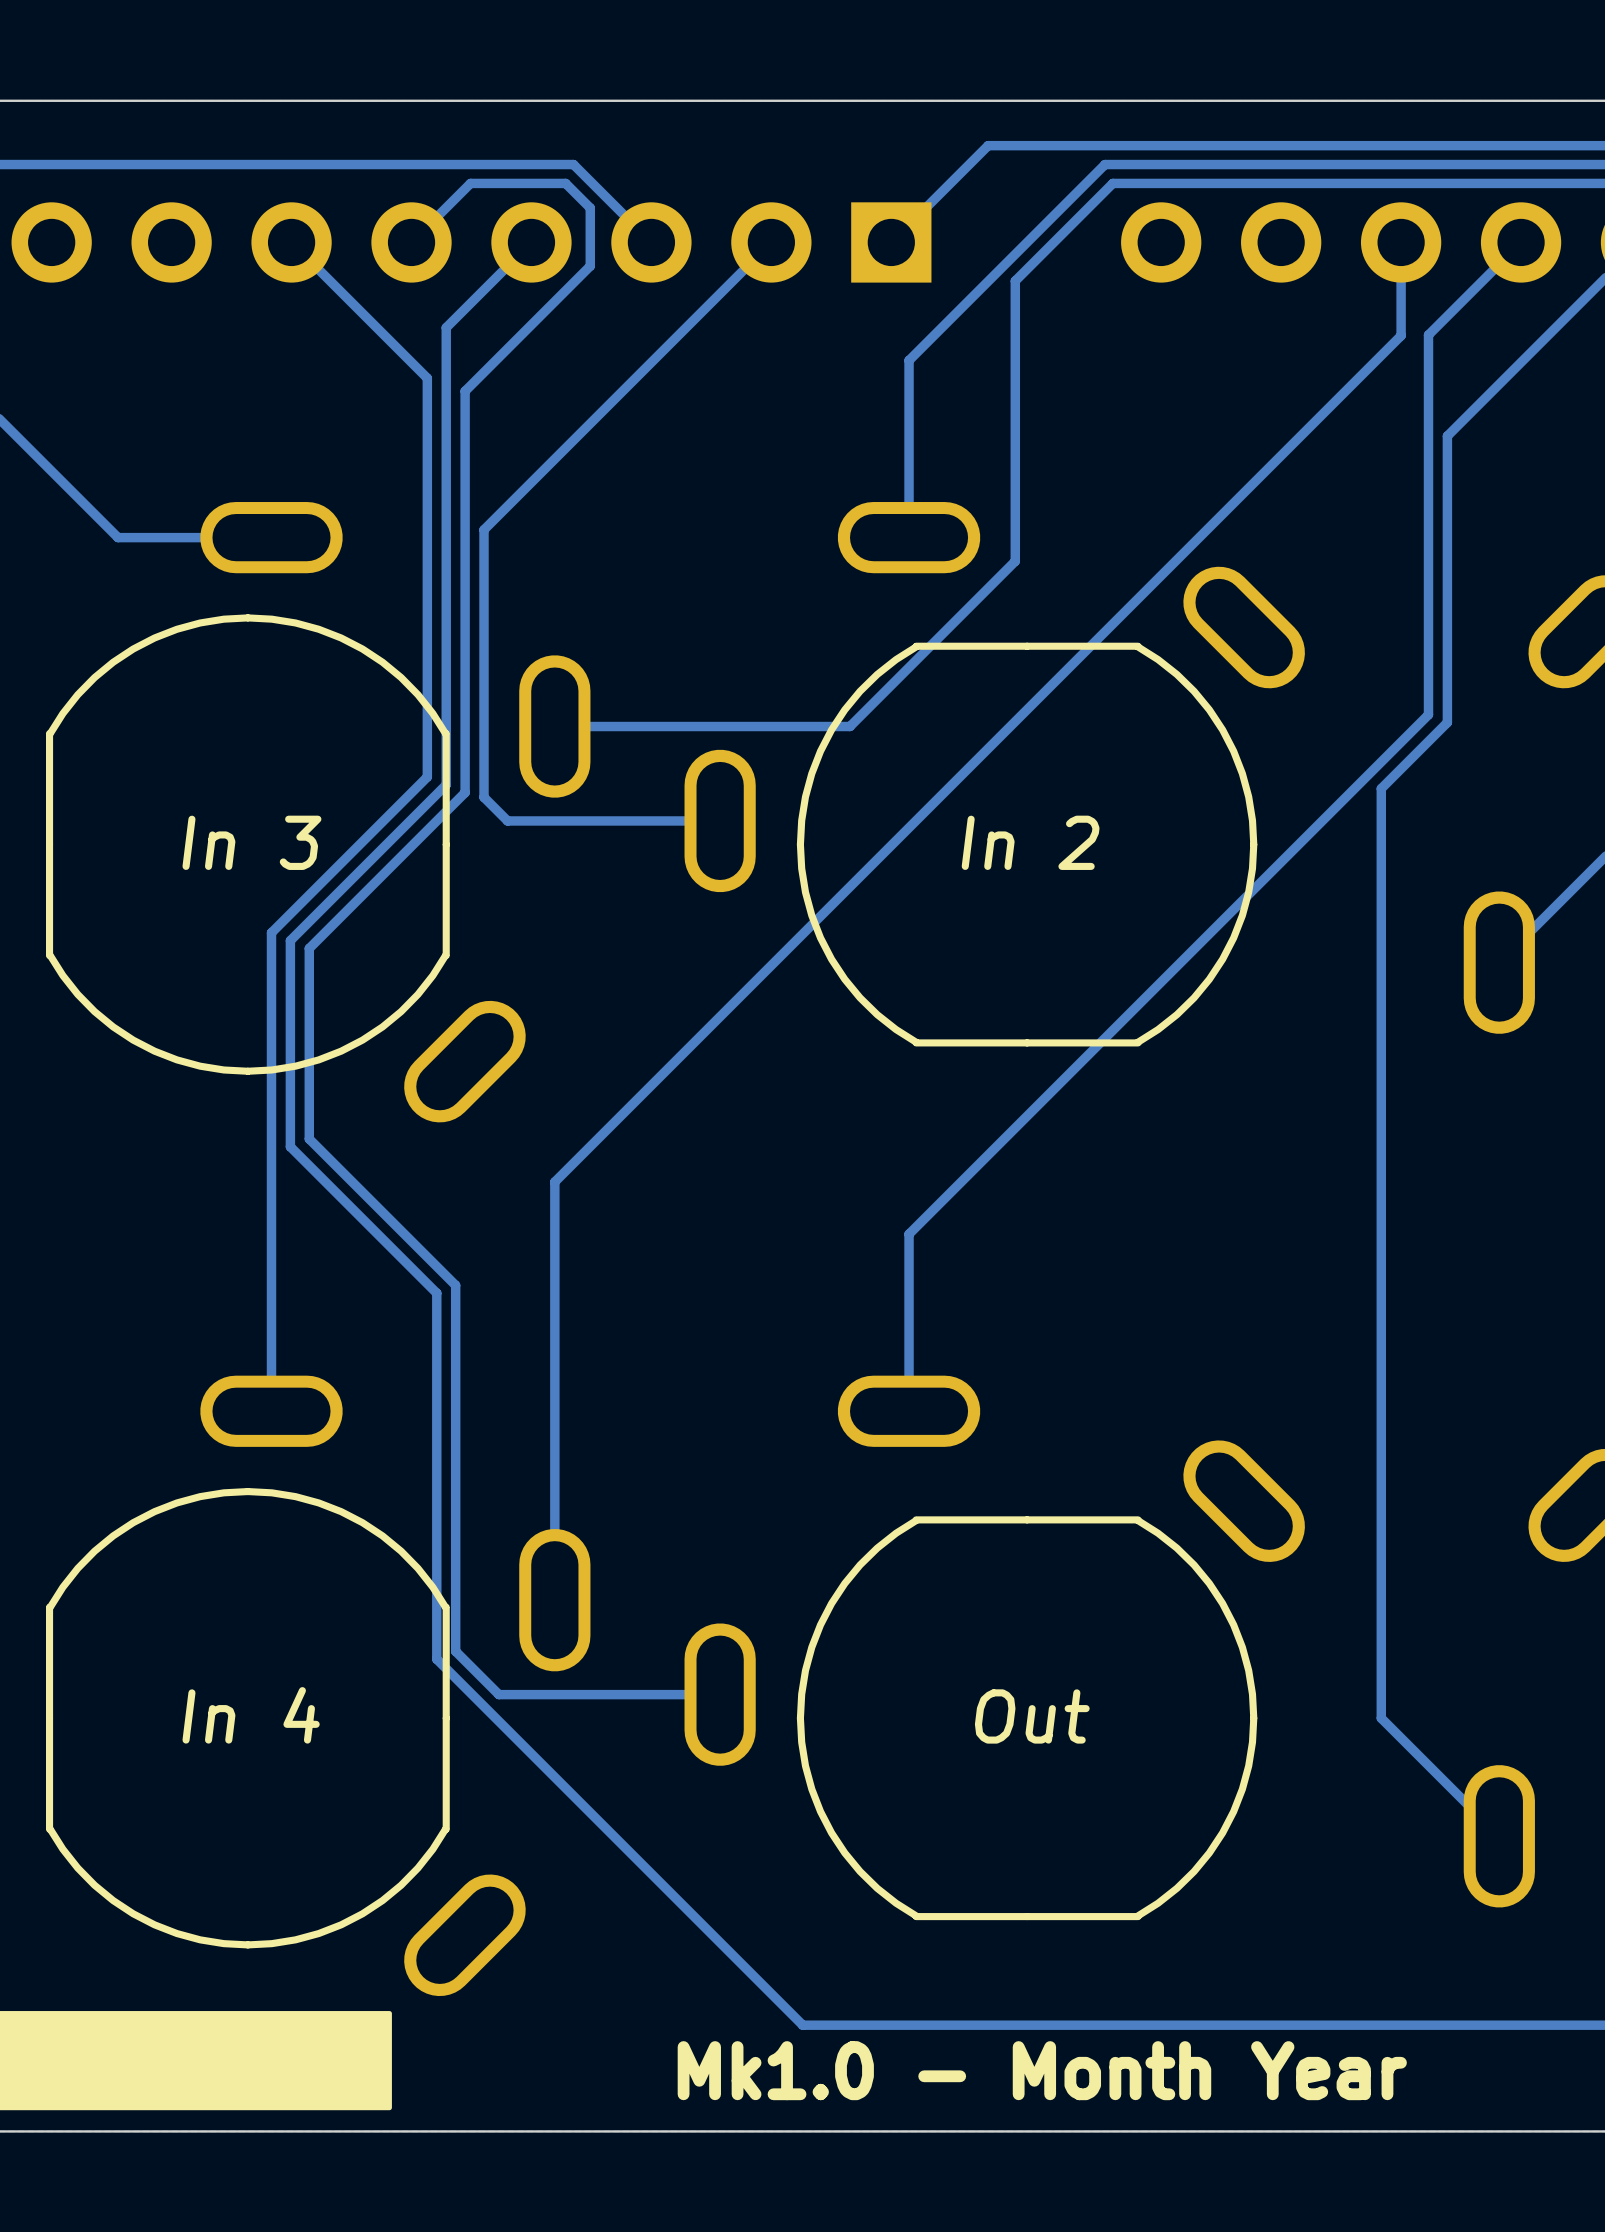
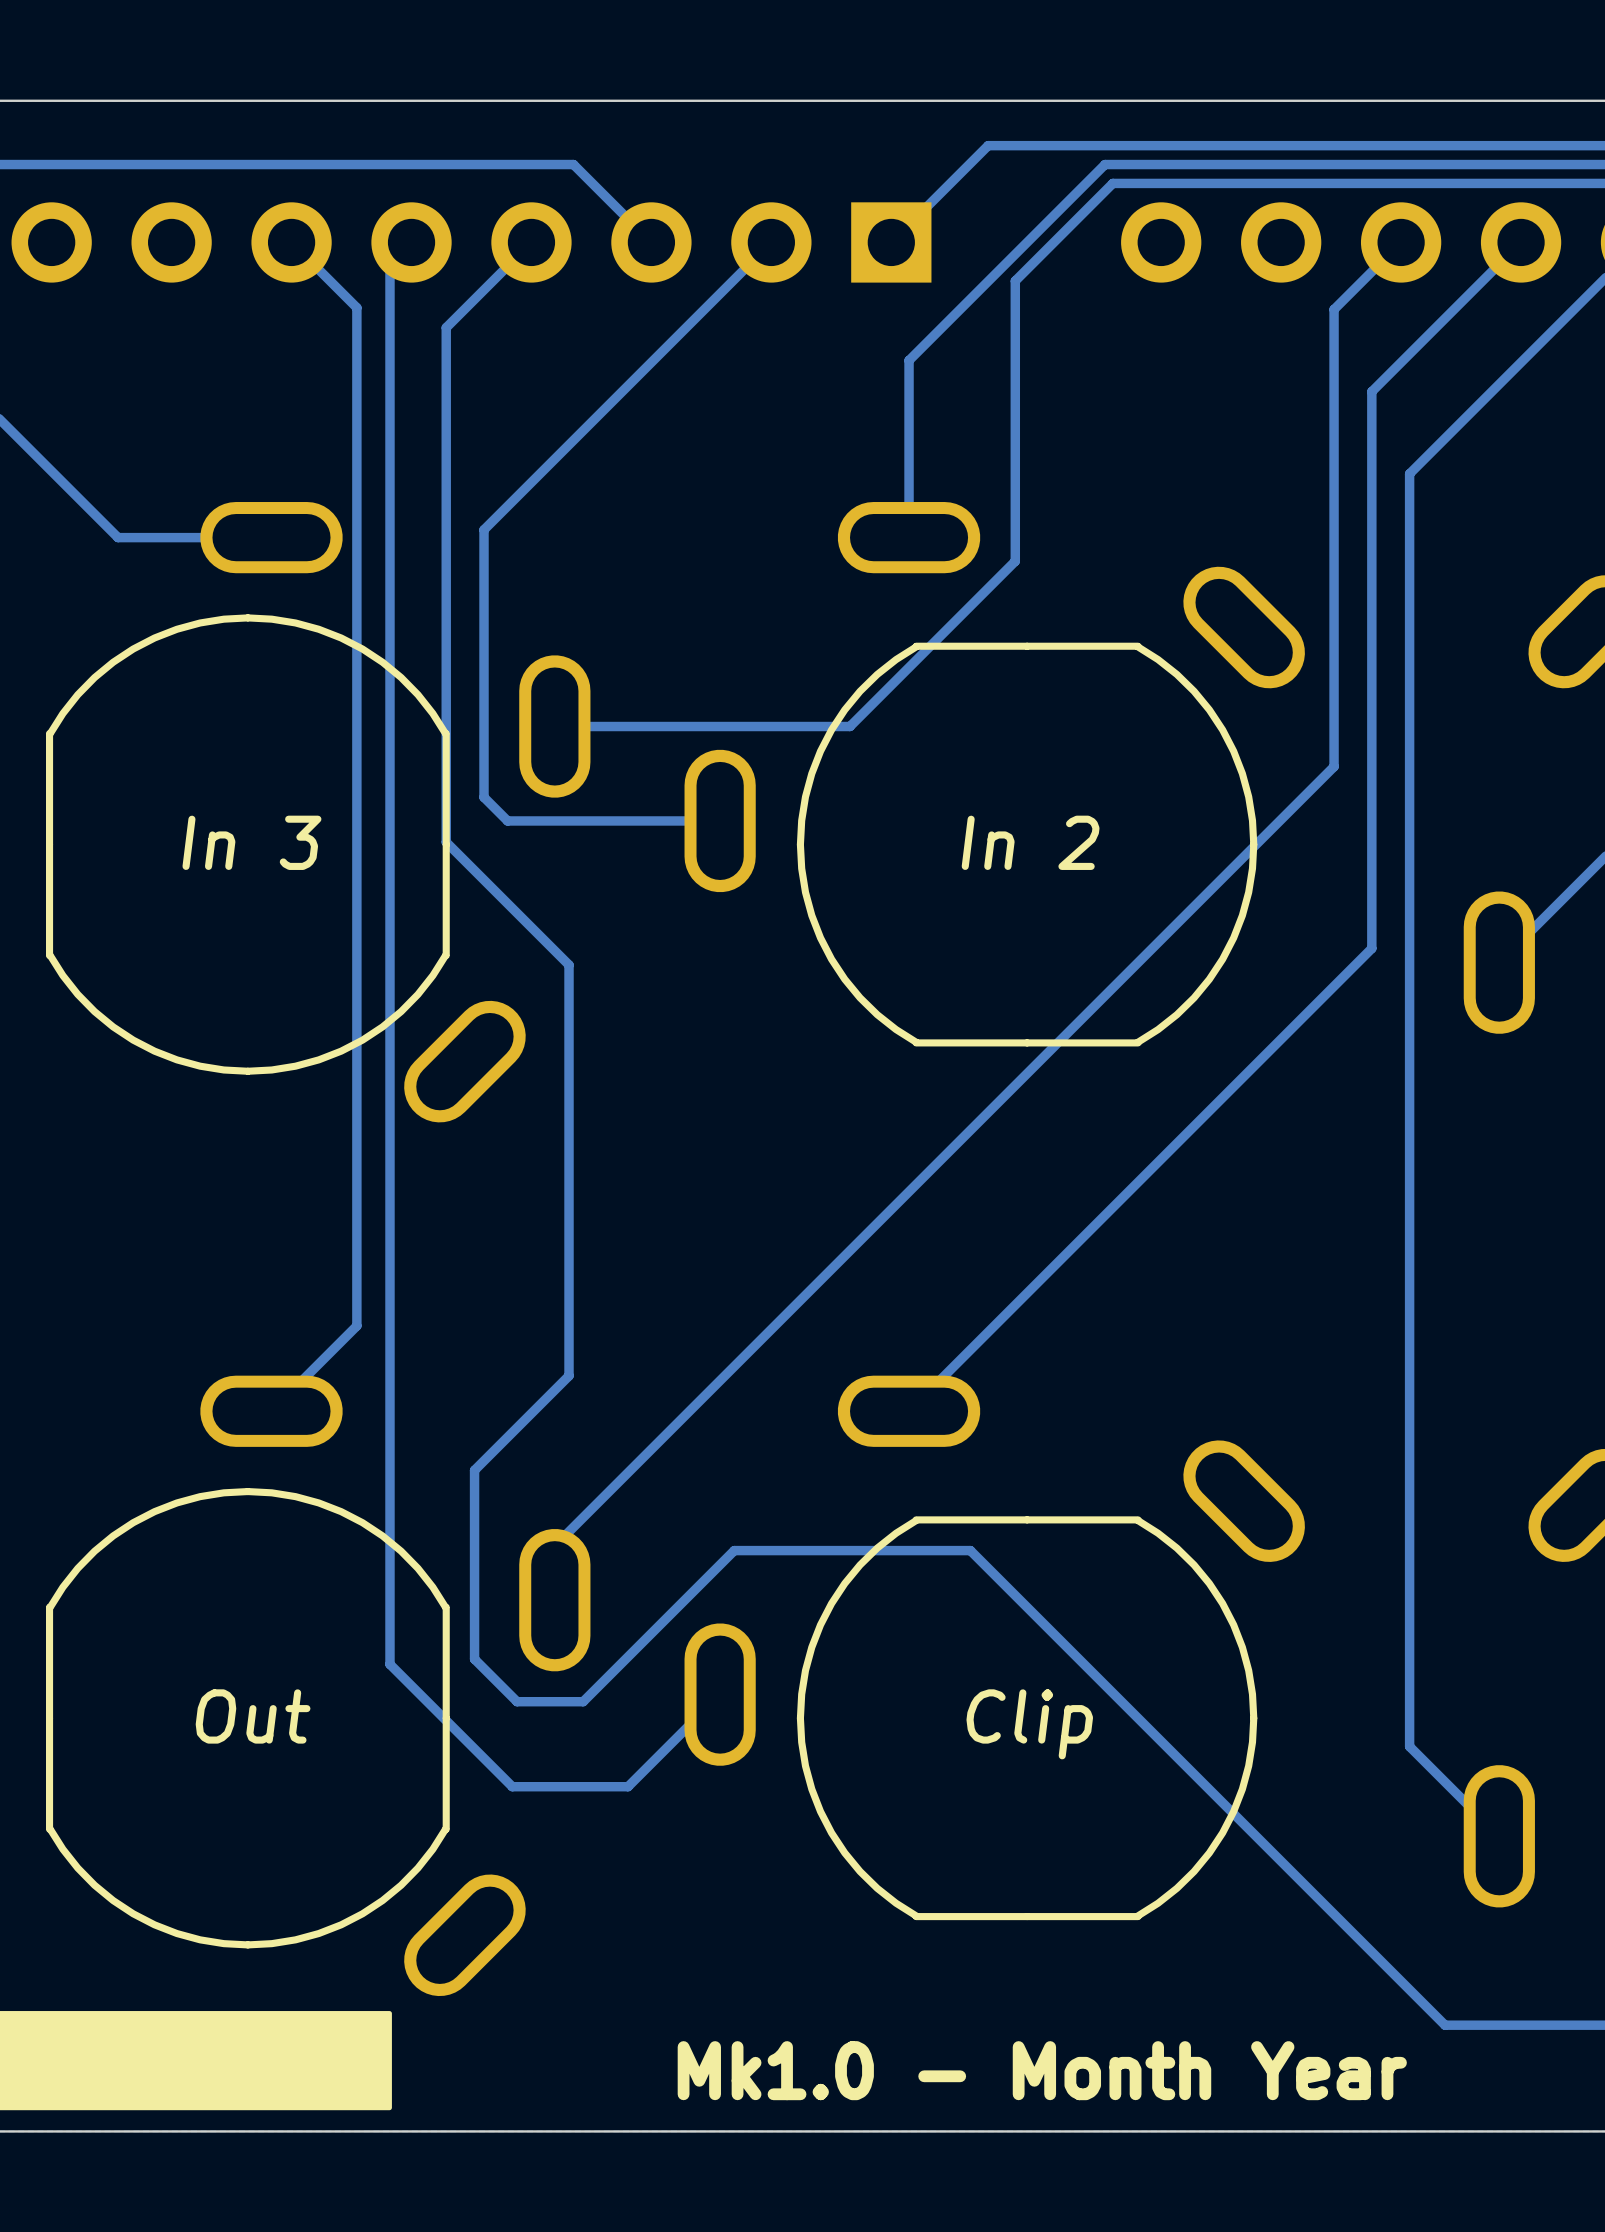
track: (411, 242) (470, 183) (565, 183) (590, 208) (590, 266) (465, 391) (465, 792) (309, 948) (309, 1138) (455, 1285) (455, 1651) (498, 1694) (720, 1694) -> (411, 242) (389, 263) (389, 1664) (512, 1786) (628, 1786) (720, 1694)
track: (1401, 242) (1401, 335) (554, 1181) (554, 1545) -> (1401, 242) (1334, 309) (1334, 766) (554, 1545)
track: (356, 307) (427, 378) (427, 776) (271, 932) (271, 1411) -> (356, 307) (356, 1325) (271, 1411)
track: (1428, 335) (1428, 714) (909, 1234) (909, 1411) -> (1428, 335) (1371, 391) (1371, 948) (909, 1411)
track: (1447, 436) (1447, 722) (1381, 788) (1381, 1718) (1409, 1746) -> (1447, 436) (1409, 473) (1409, 1746)
track: (446, 784) (290, 940) (290, 1146) (436, 1293) (436, 1659) (802, 2025) (1445, 2025) -> (446, 784) (446, 842) (569, 965) (569, 1375) (474, 1470) (474, 1659) (517, 1701) (583, 1701) (734, 1550) (970, 1550) (1445, 2025)
part text: In 4 (251, 1715) -> Out (253, 1716)
part text: Out (1032, 1716) -> Clip (1029, 1724)

